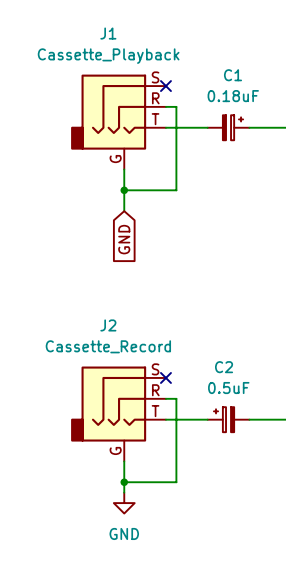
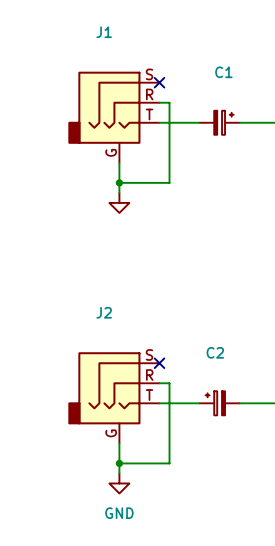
J1 value: Cassette_Playback (108, 56) -> none
C1 value: 0.18uF (233, 96) -> none
power symbol: none -> (119, 202)
global label: GND (124, 239) -> none
J2 value: Cassette_Record (108, 346) -> none
C2 value: 0.5uF (228, 388) -> none

